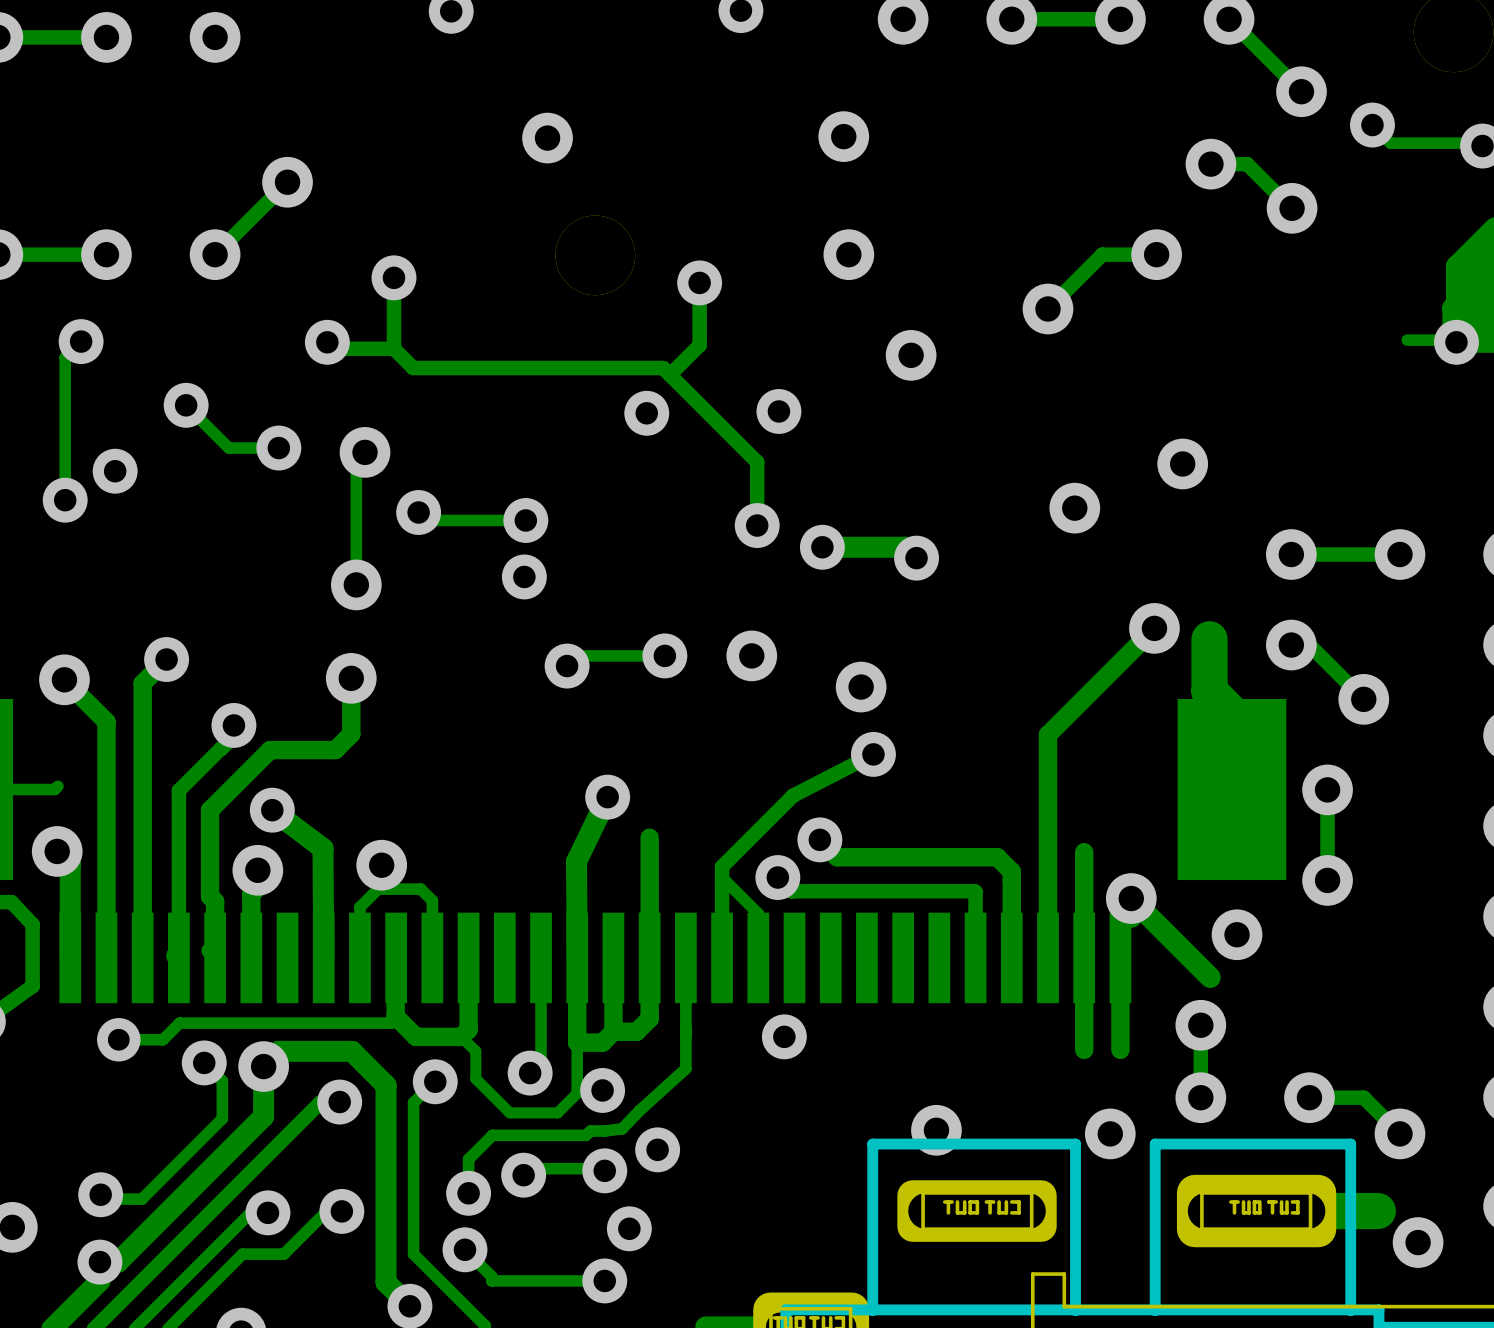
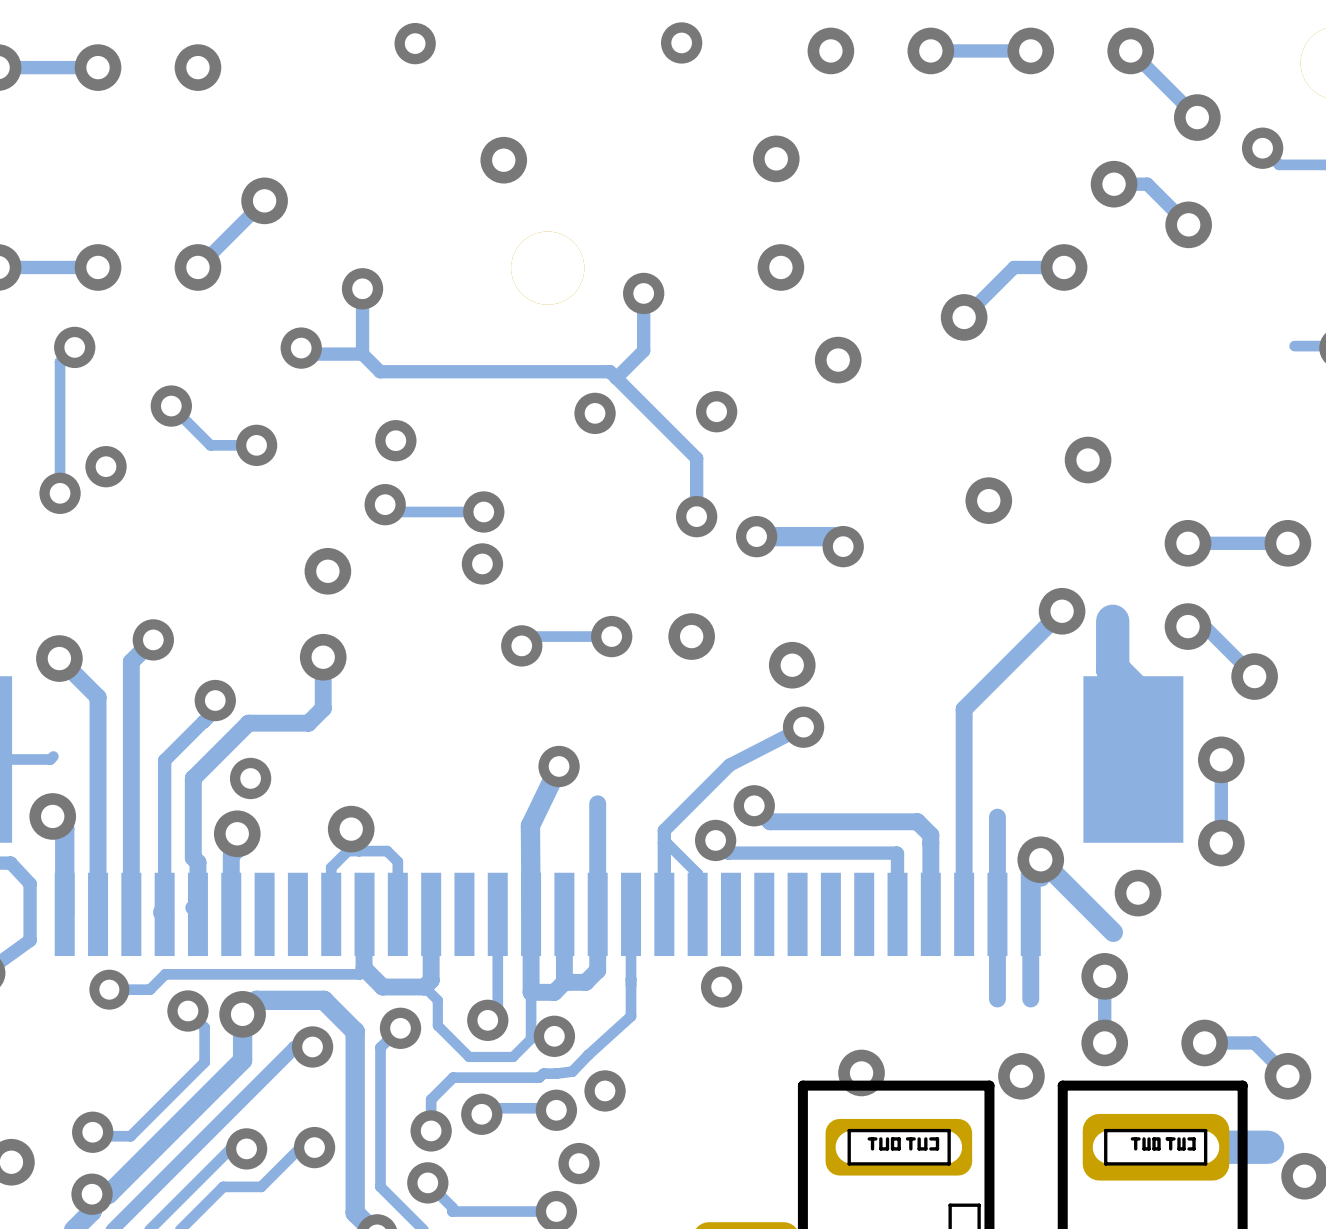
via: none -> (395, 440)
track: (365, 452) (356, 461) (356, 584) -> none
via: (365, 452) -> none
track: (272, 810) (323, 848) (323, 957) -> none

